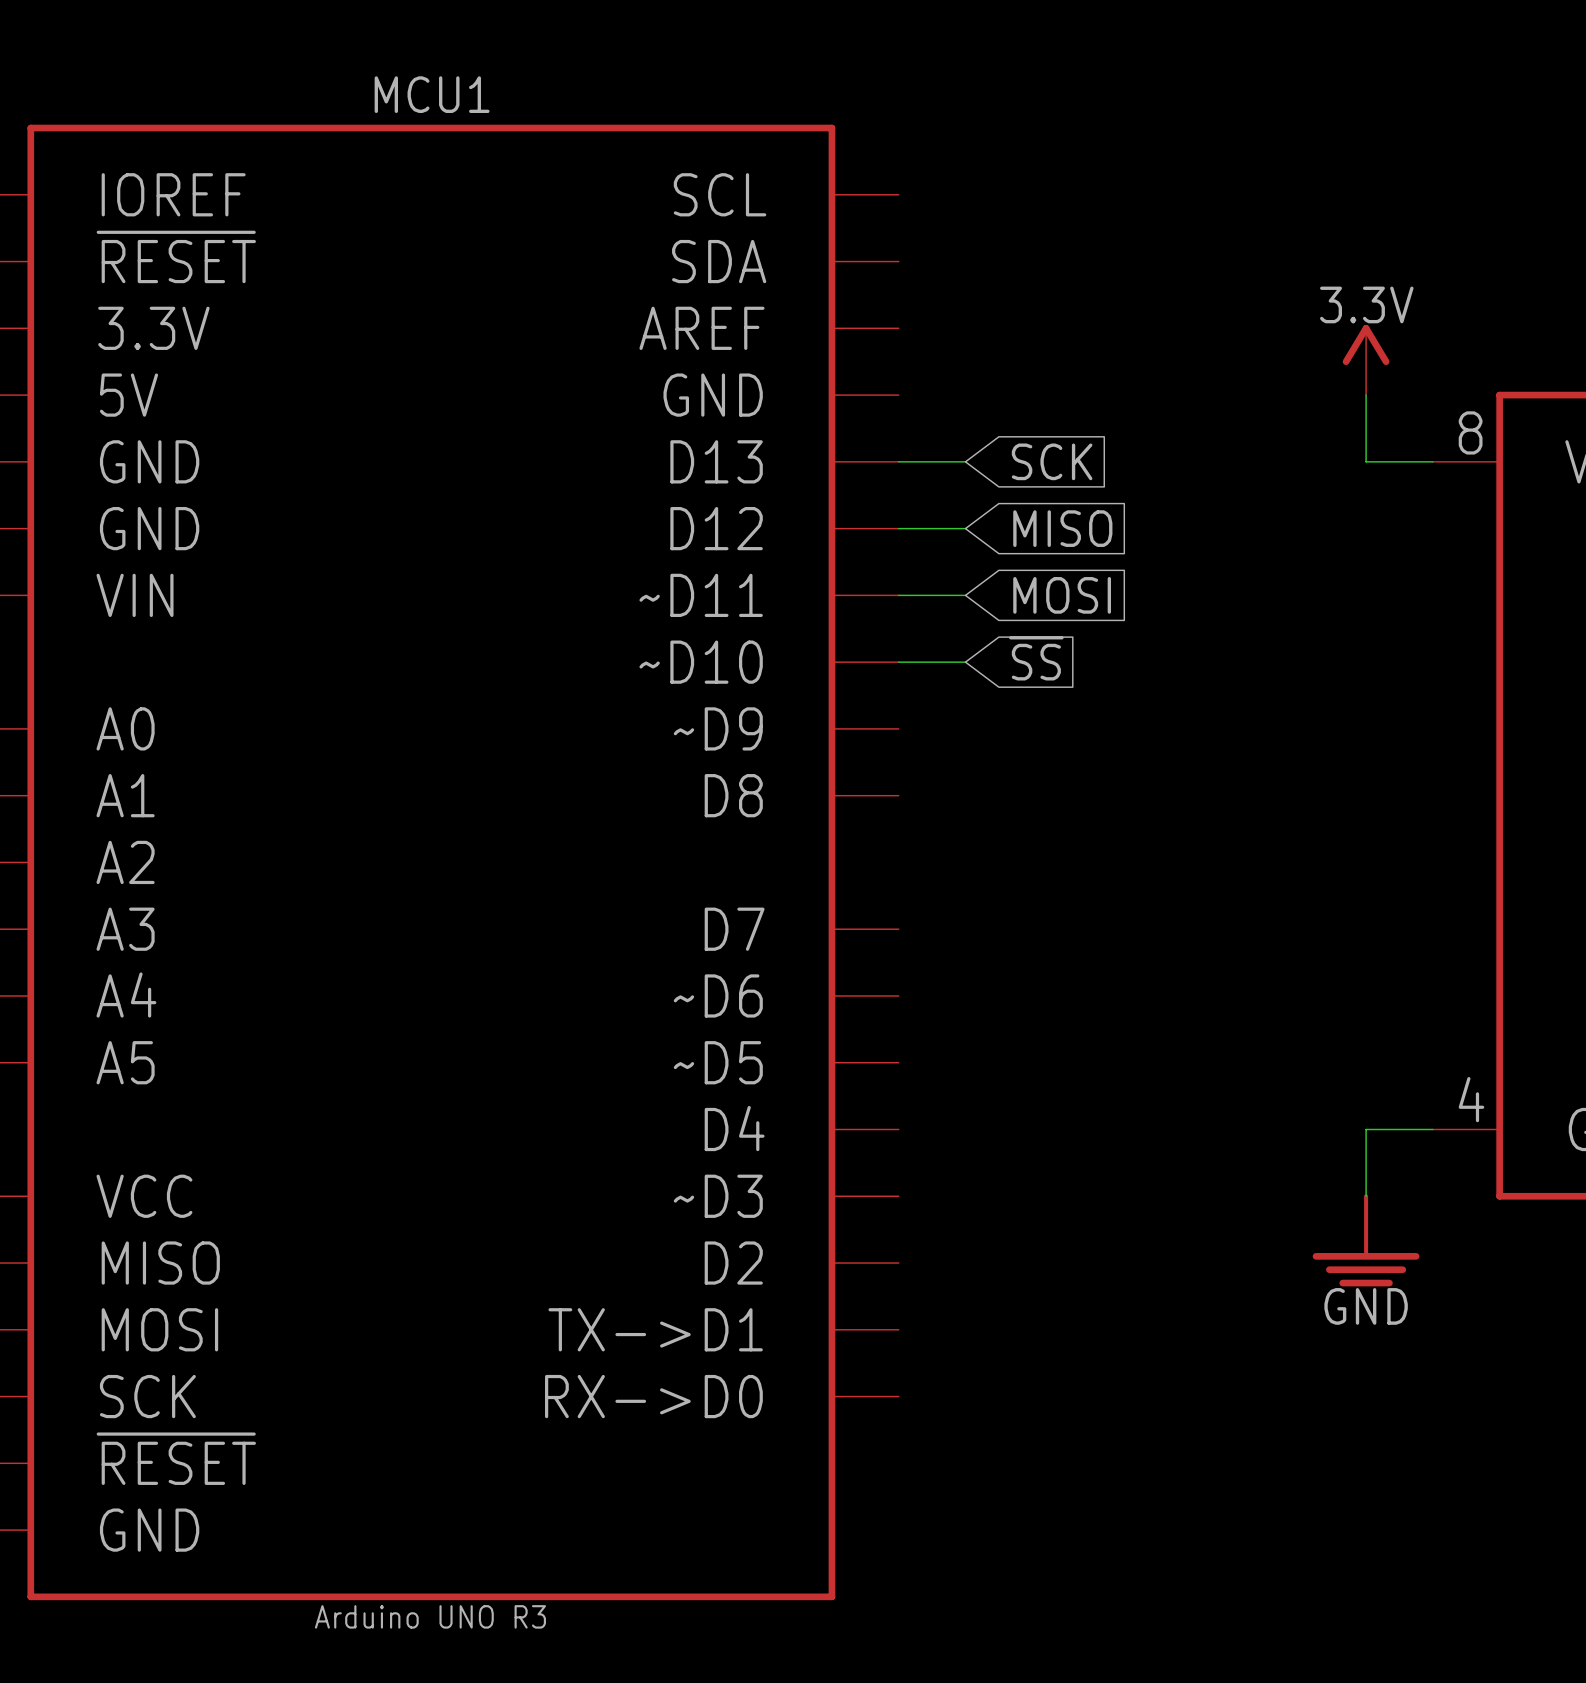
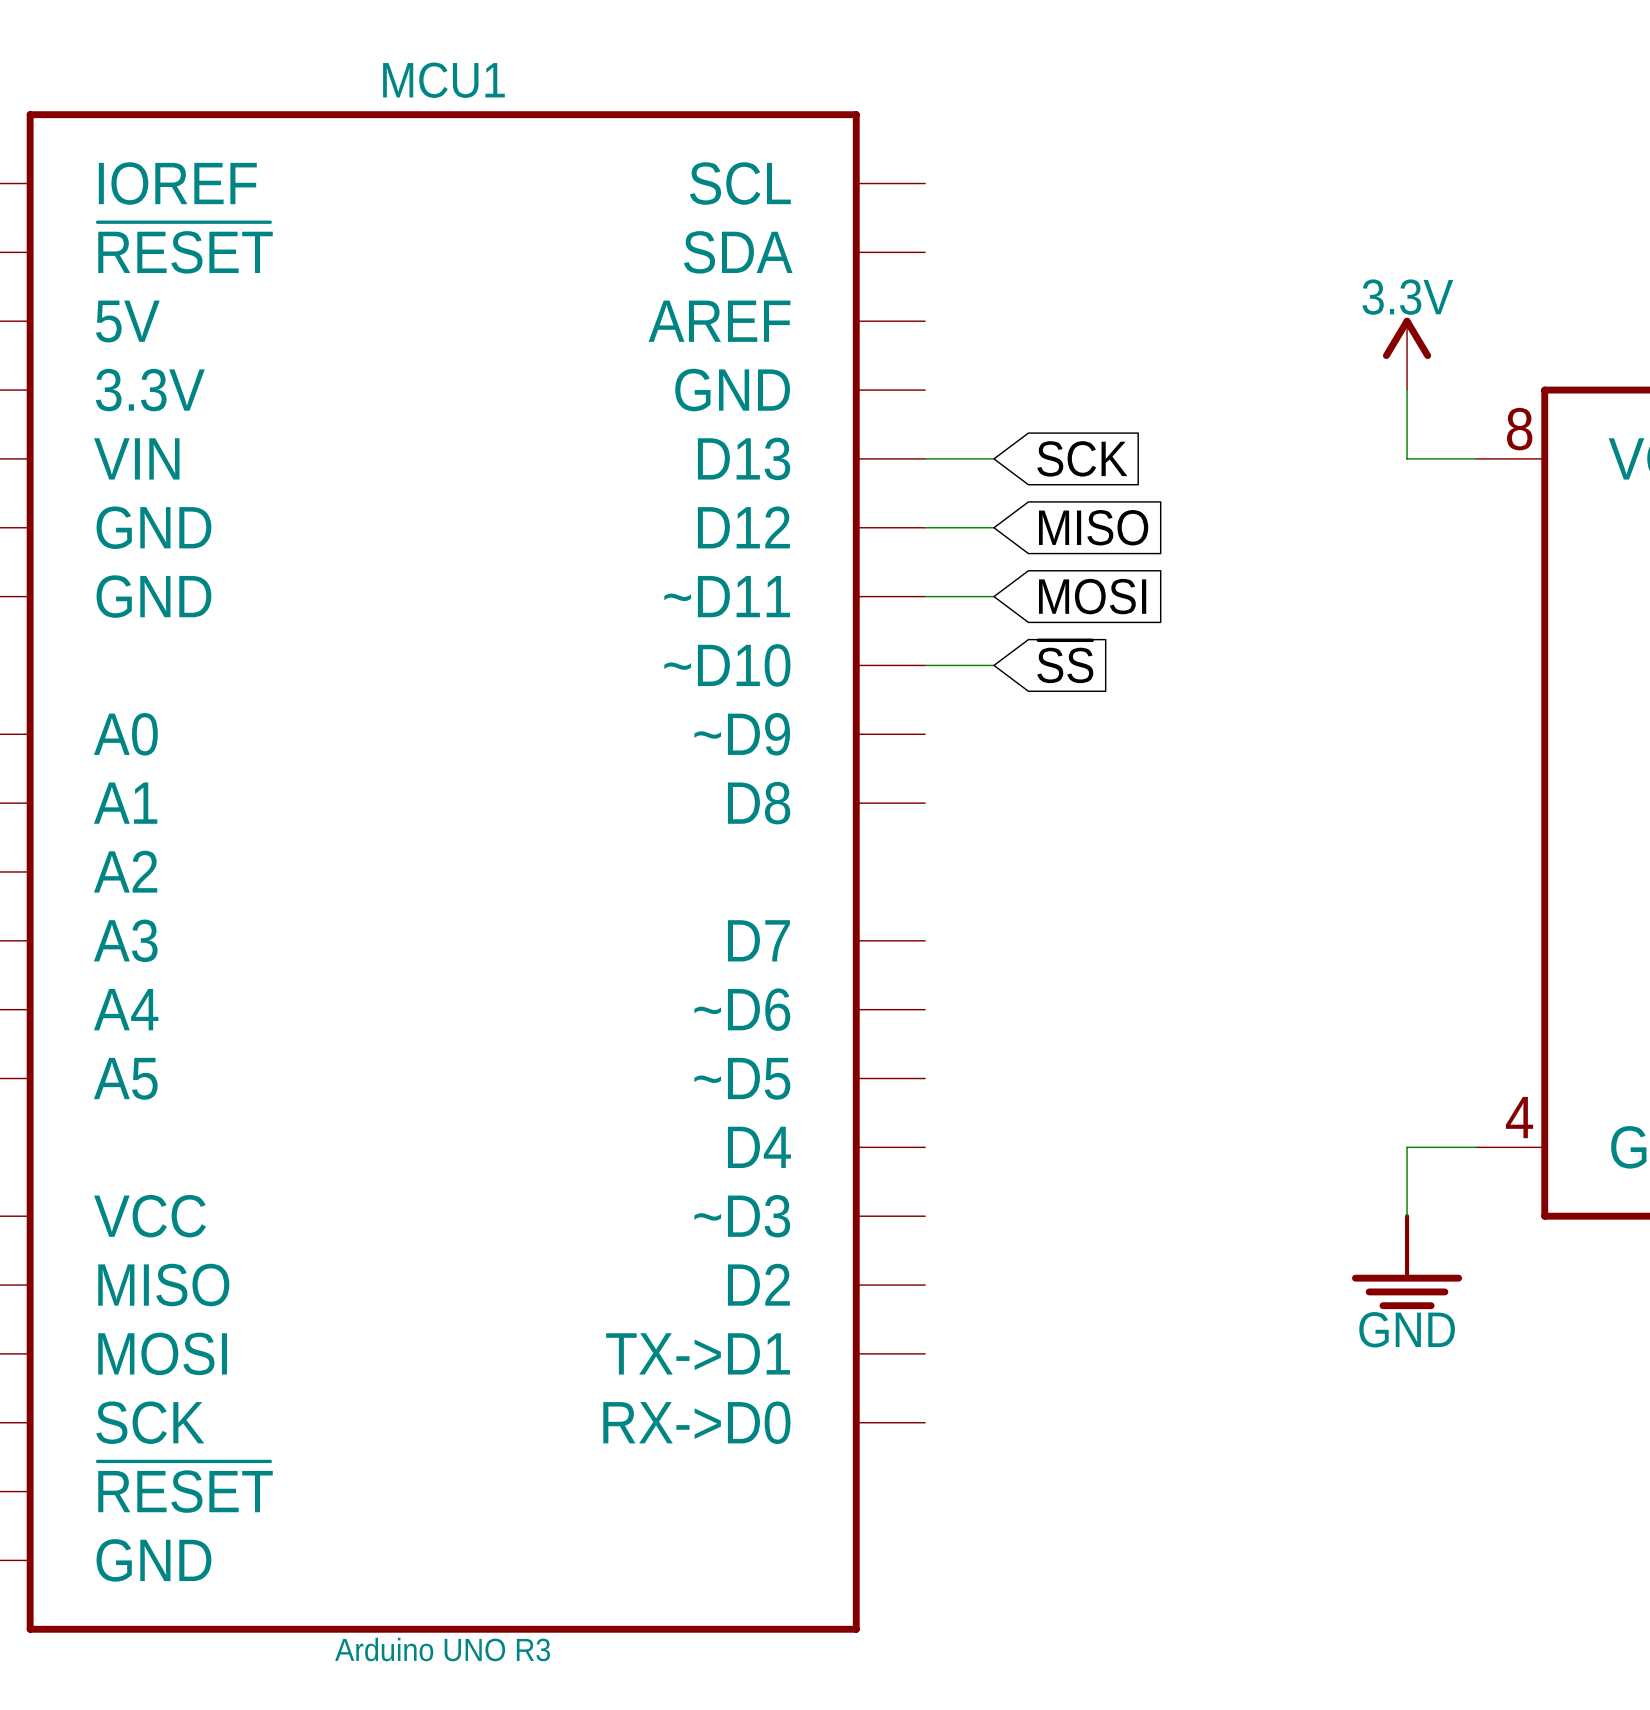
MCU1 pin name: 3.3V (153, 328) -> 5V (127, 321)
MCU1 pin name: 5V (129, 395) -> 3.3V (150, 390)
MCU1 pin name: GND (149, 461) -> VIN (136, 458)
MCU1 pin name: VIN (135, 595) -> GND (153, 596)

